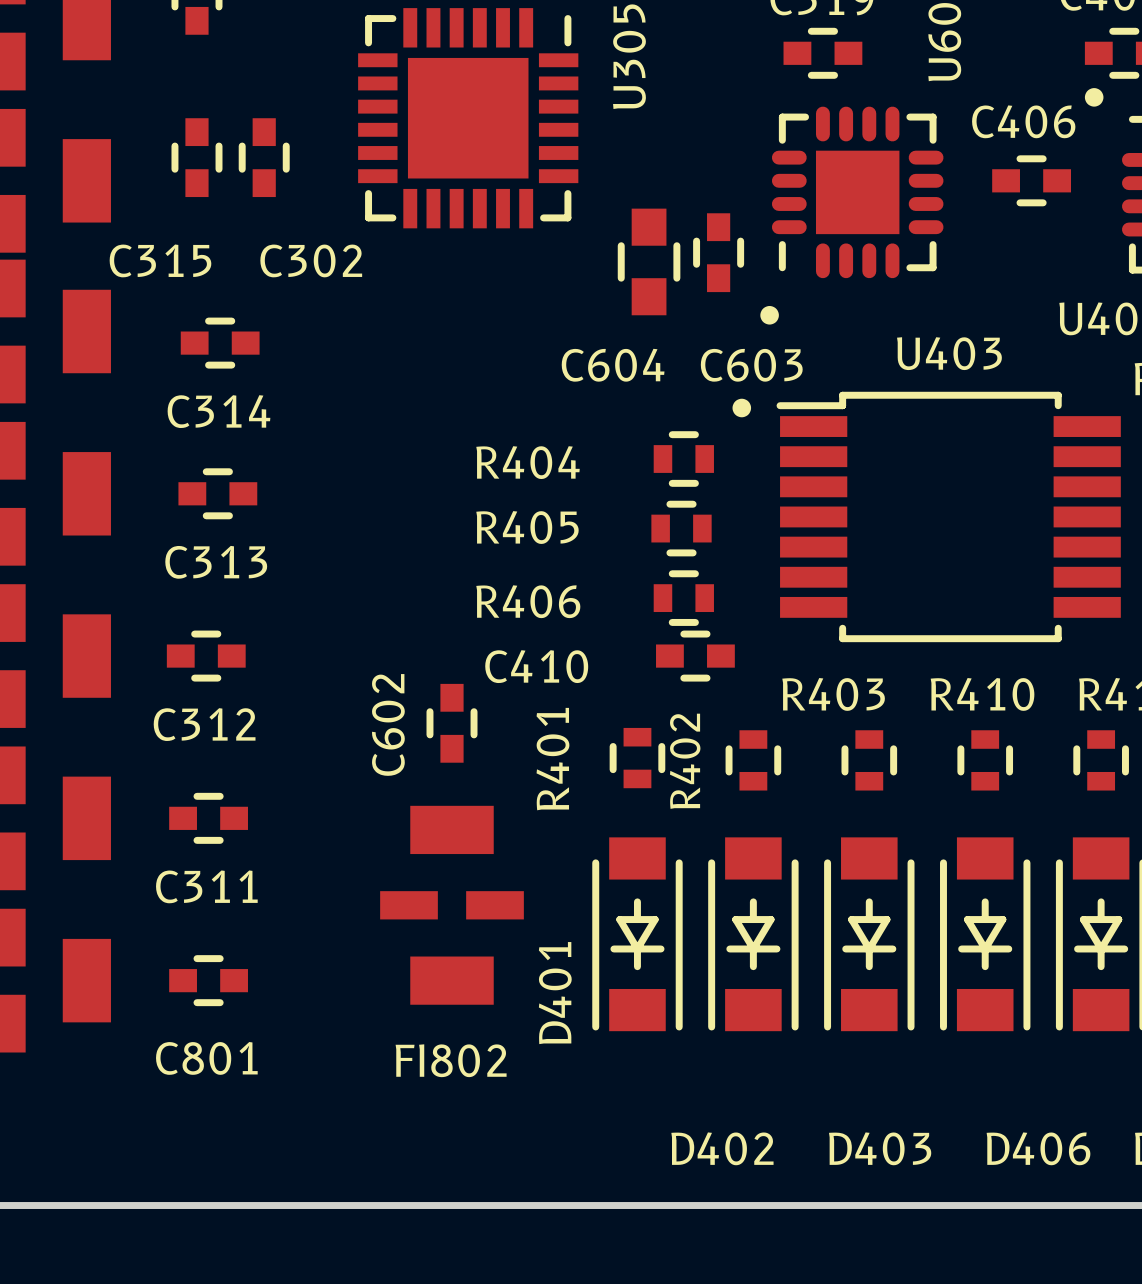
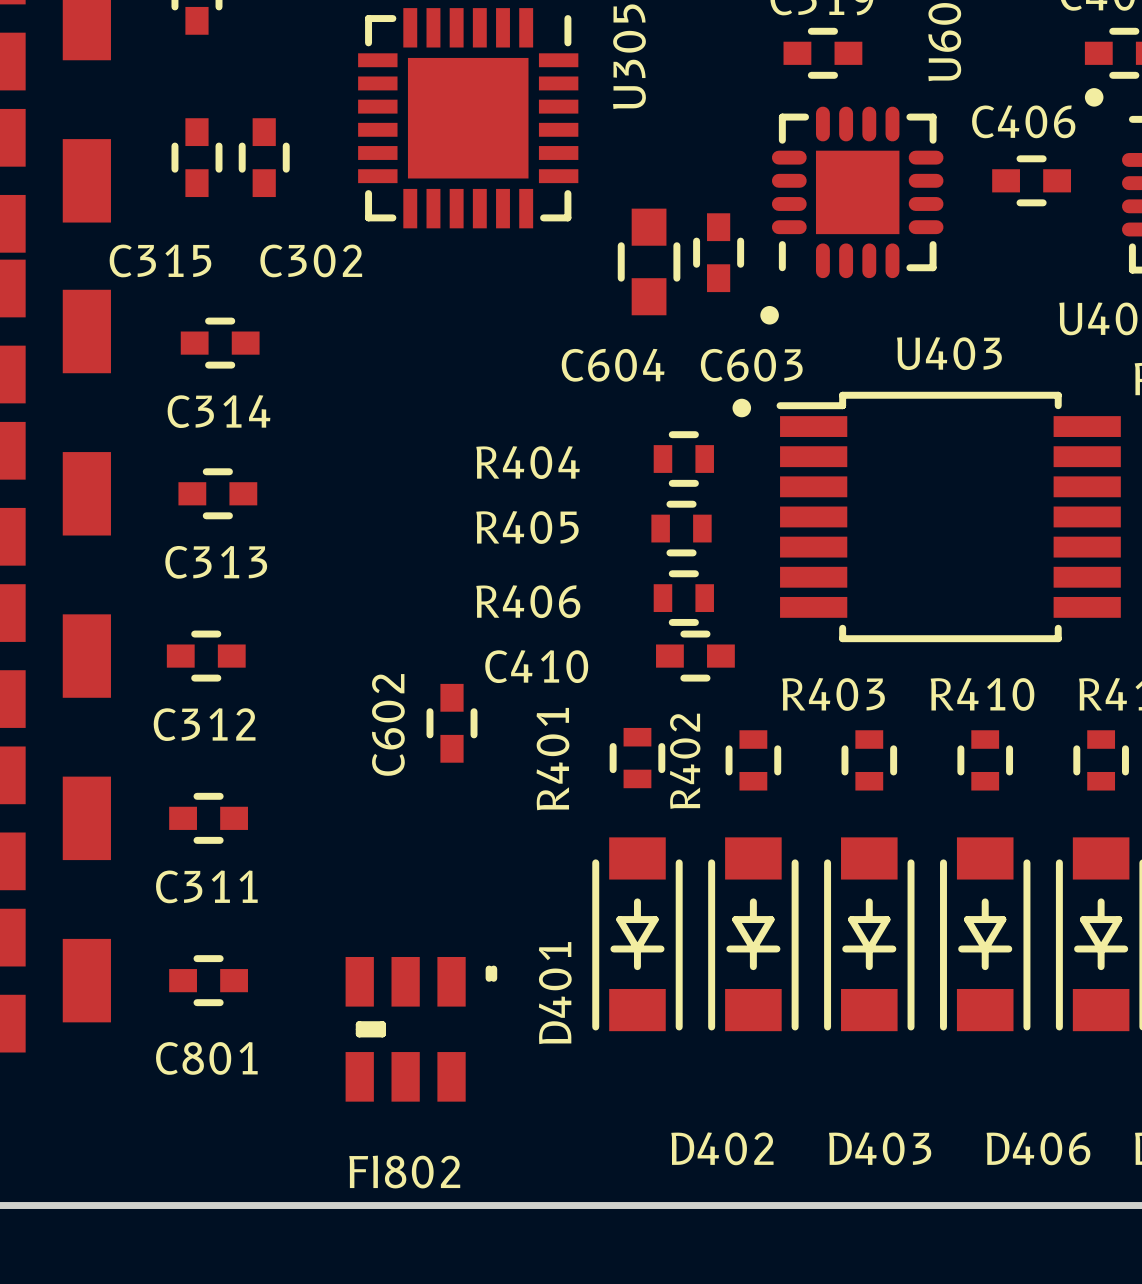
FI802 footprint: [380, 805, 524, 1005] -> [345, 956, 498, 1102]

